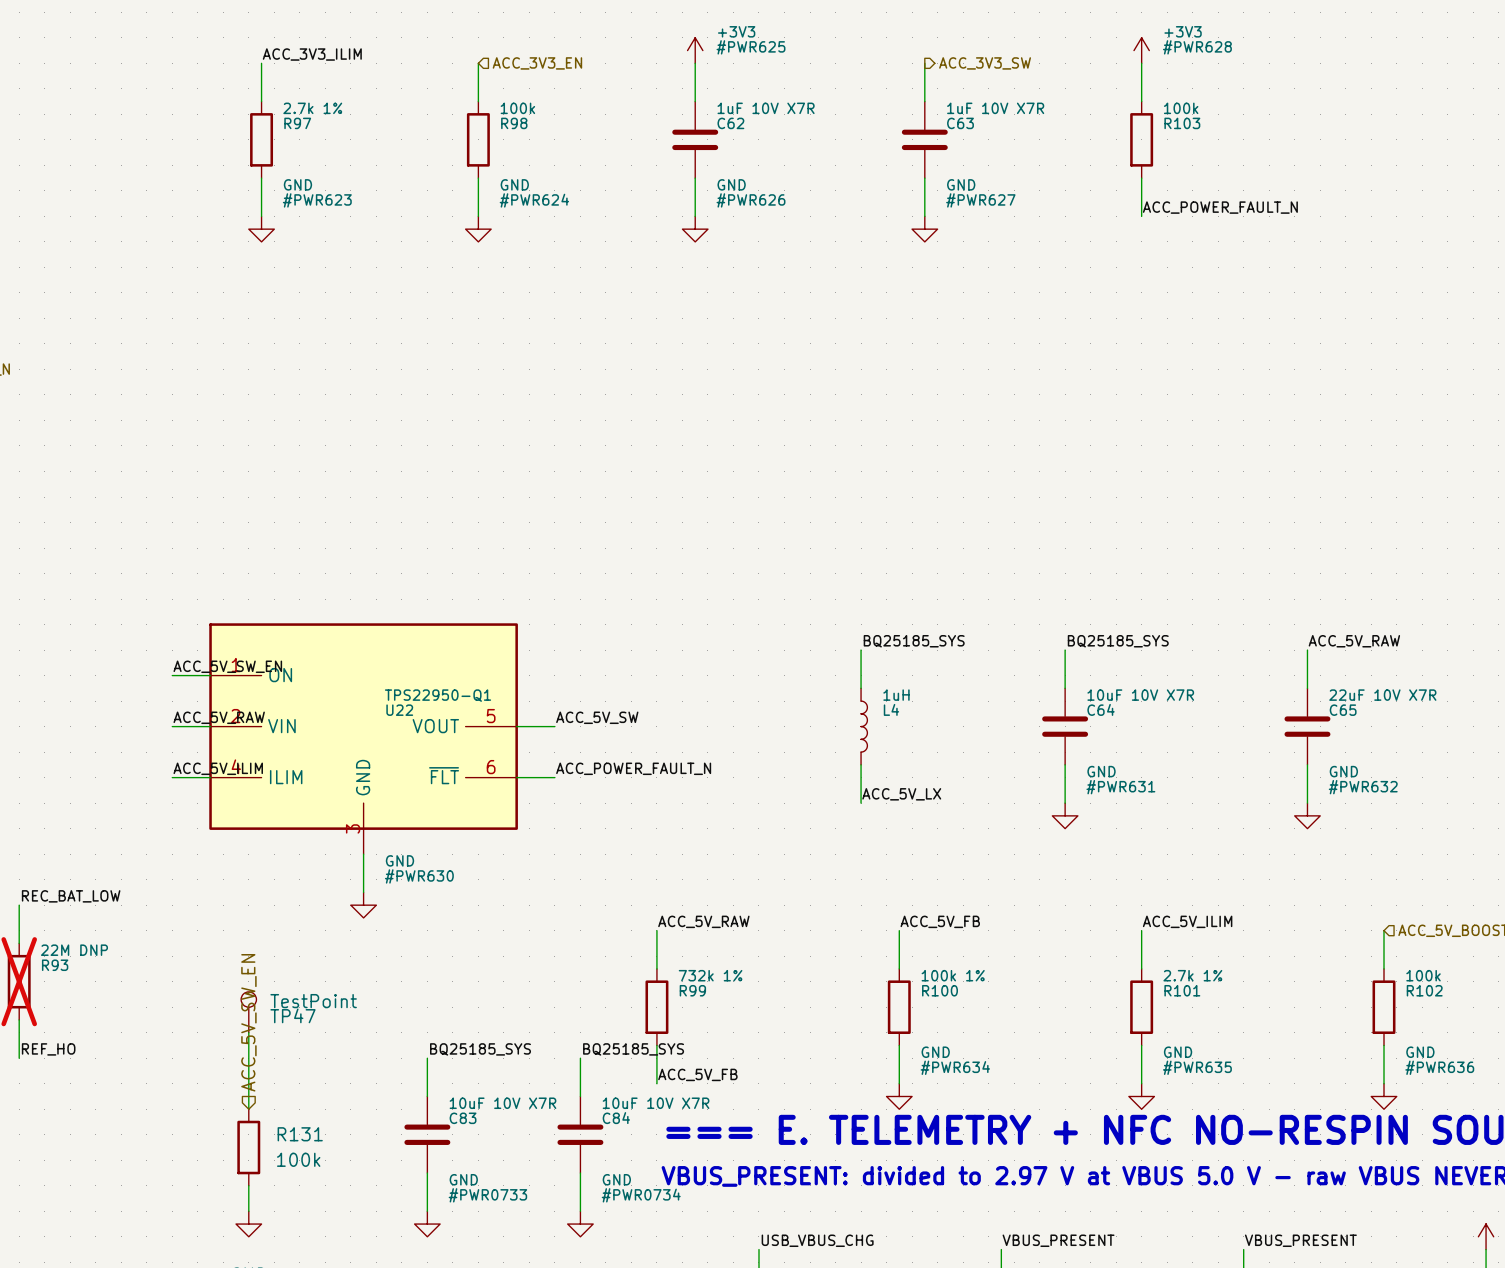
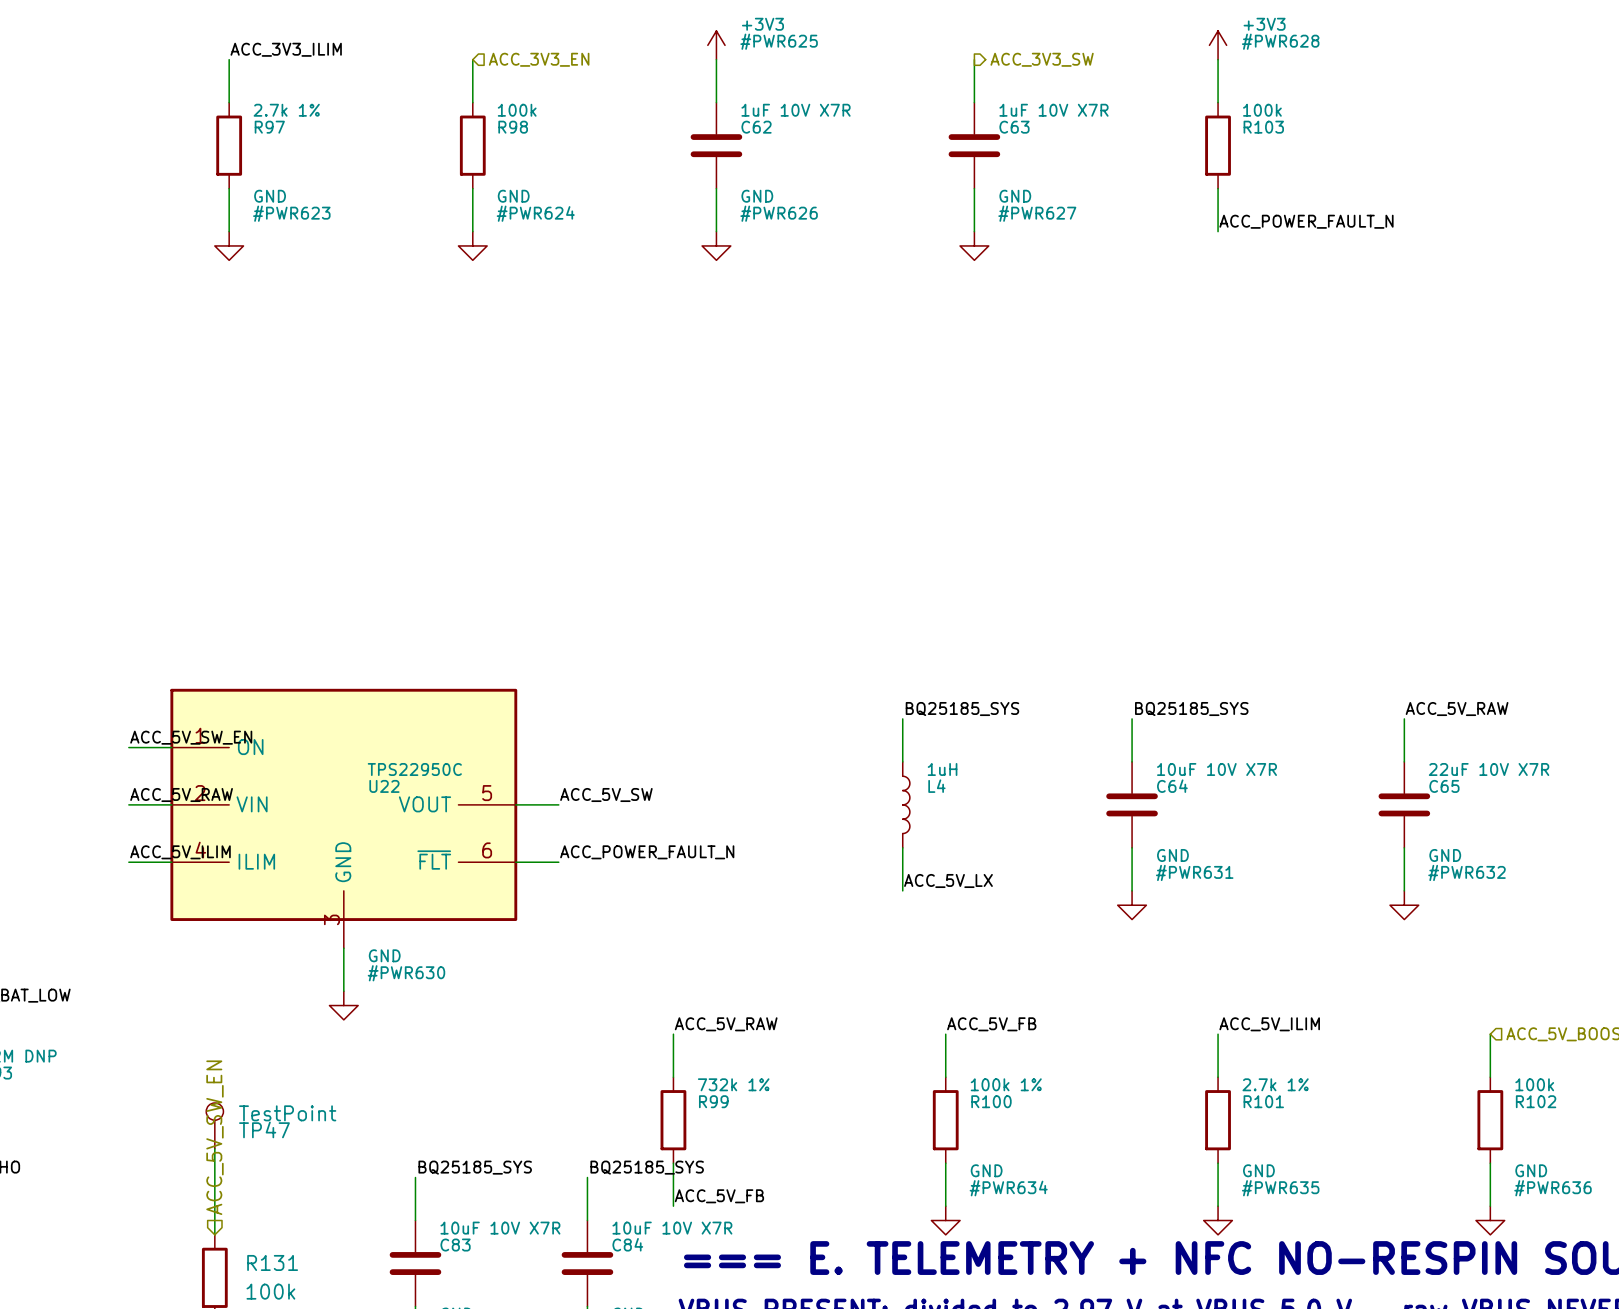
U22 value: TPS22950-Q1 (438, 695) -> TPS22950C (414, 769)

